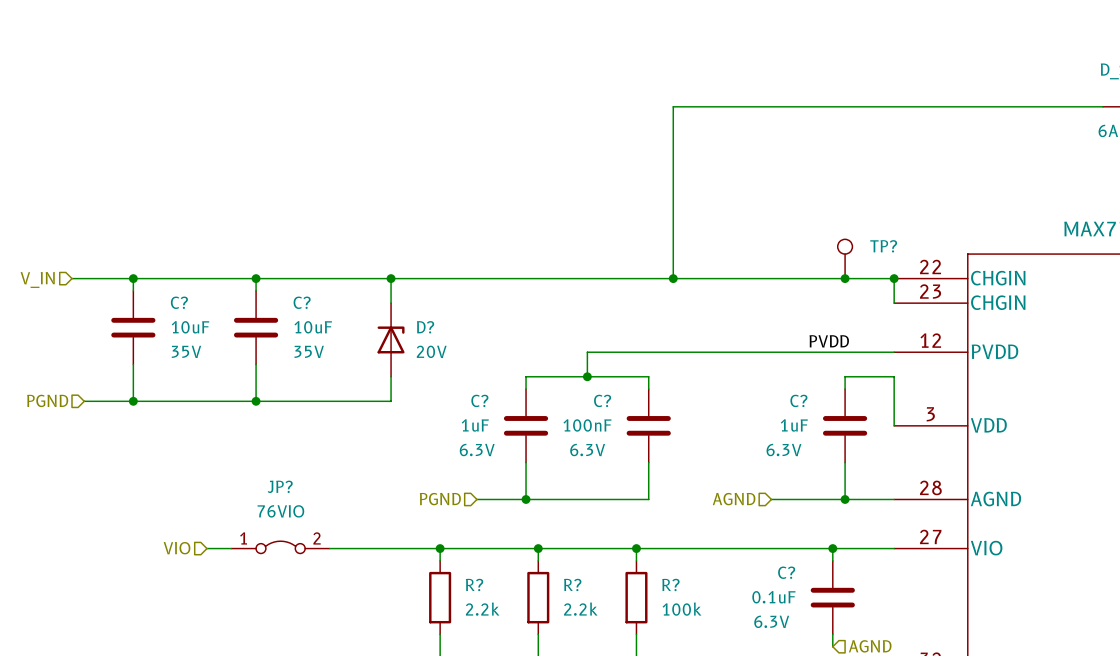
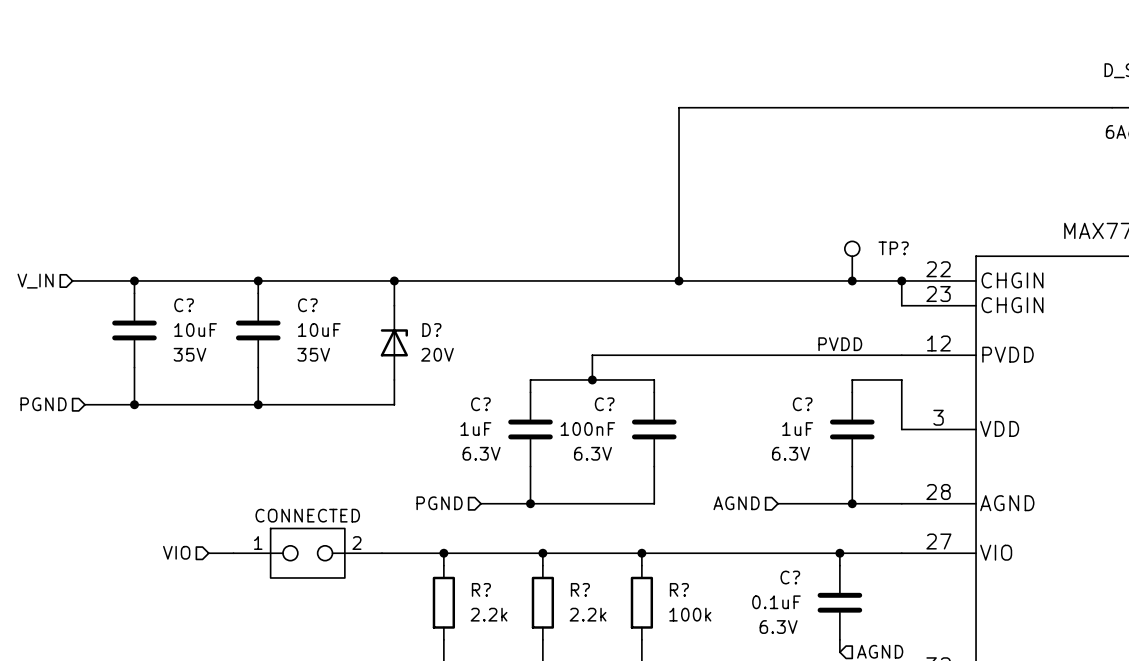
JP?: 76VIO (280, 547) -> none
part: none -> CONNECTED (307, 553)

